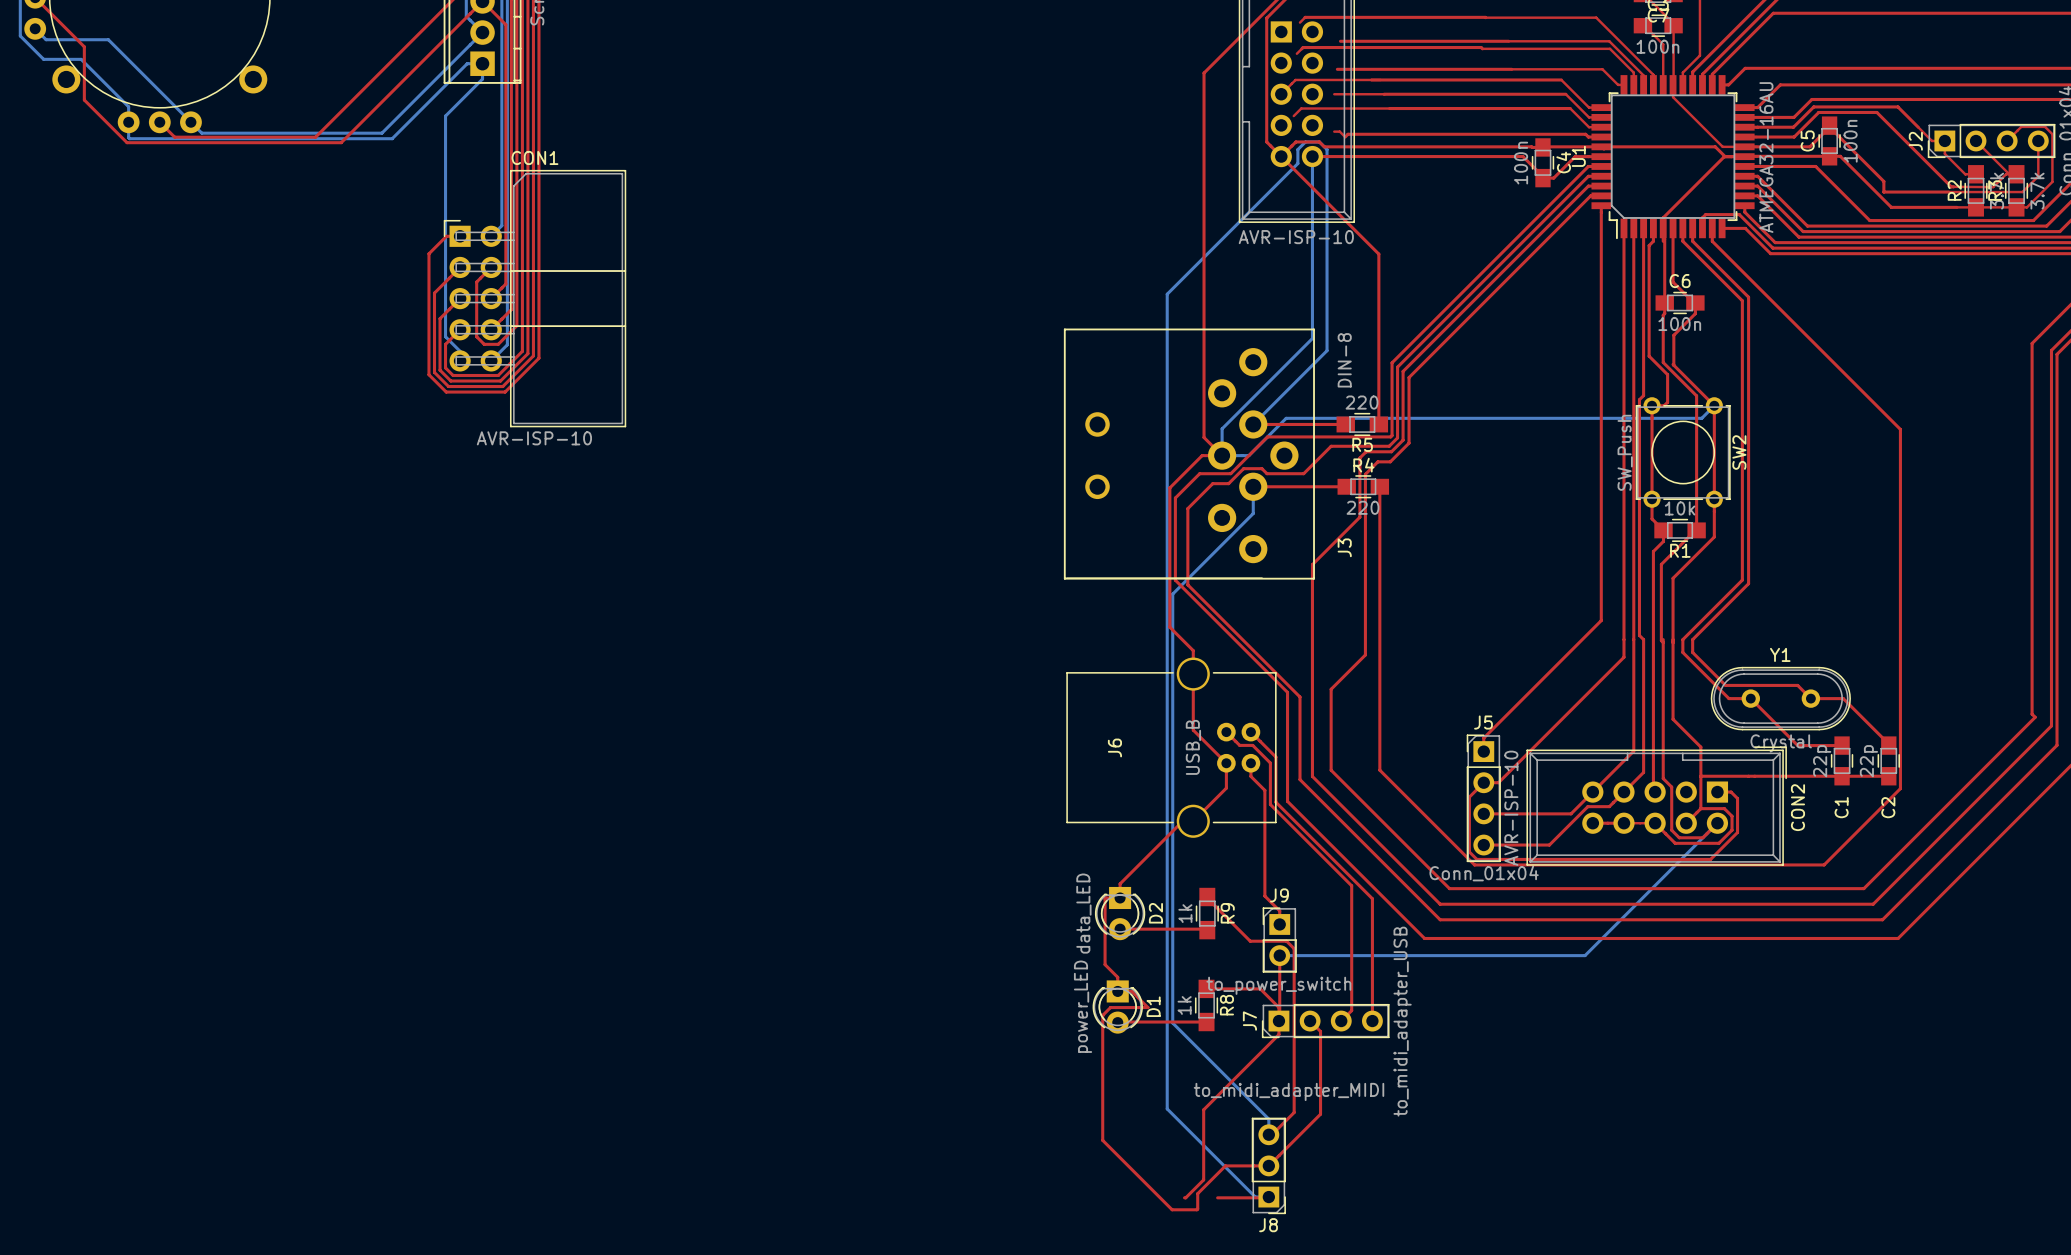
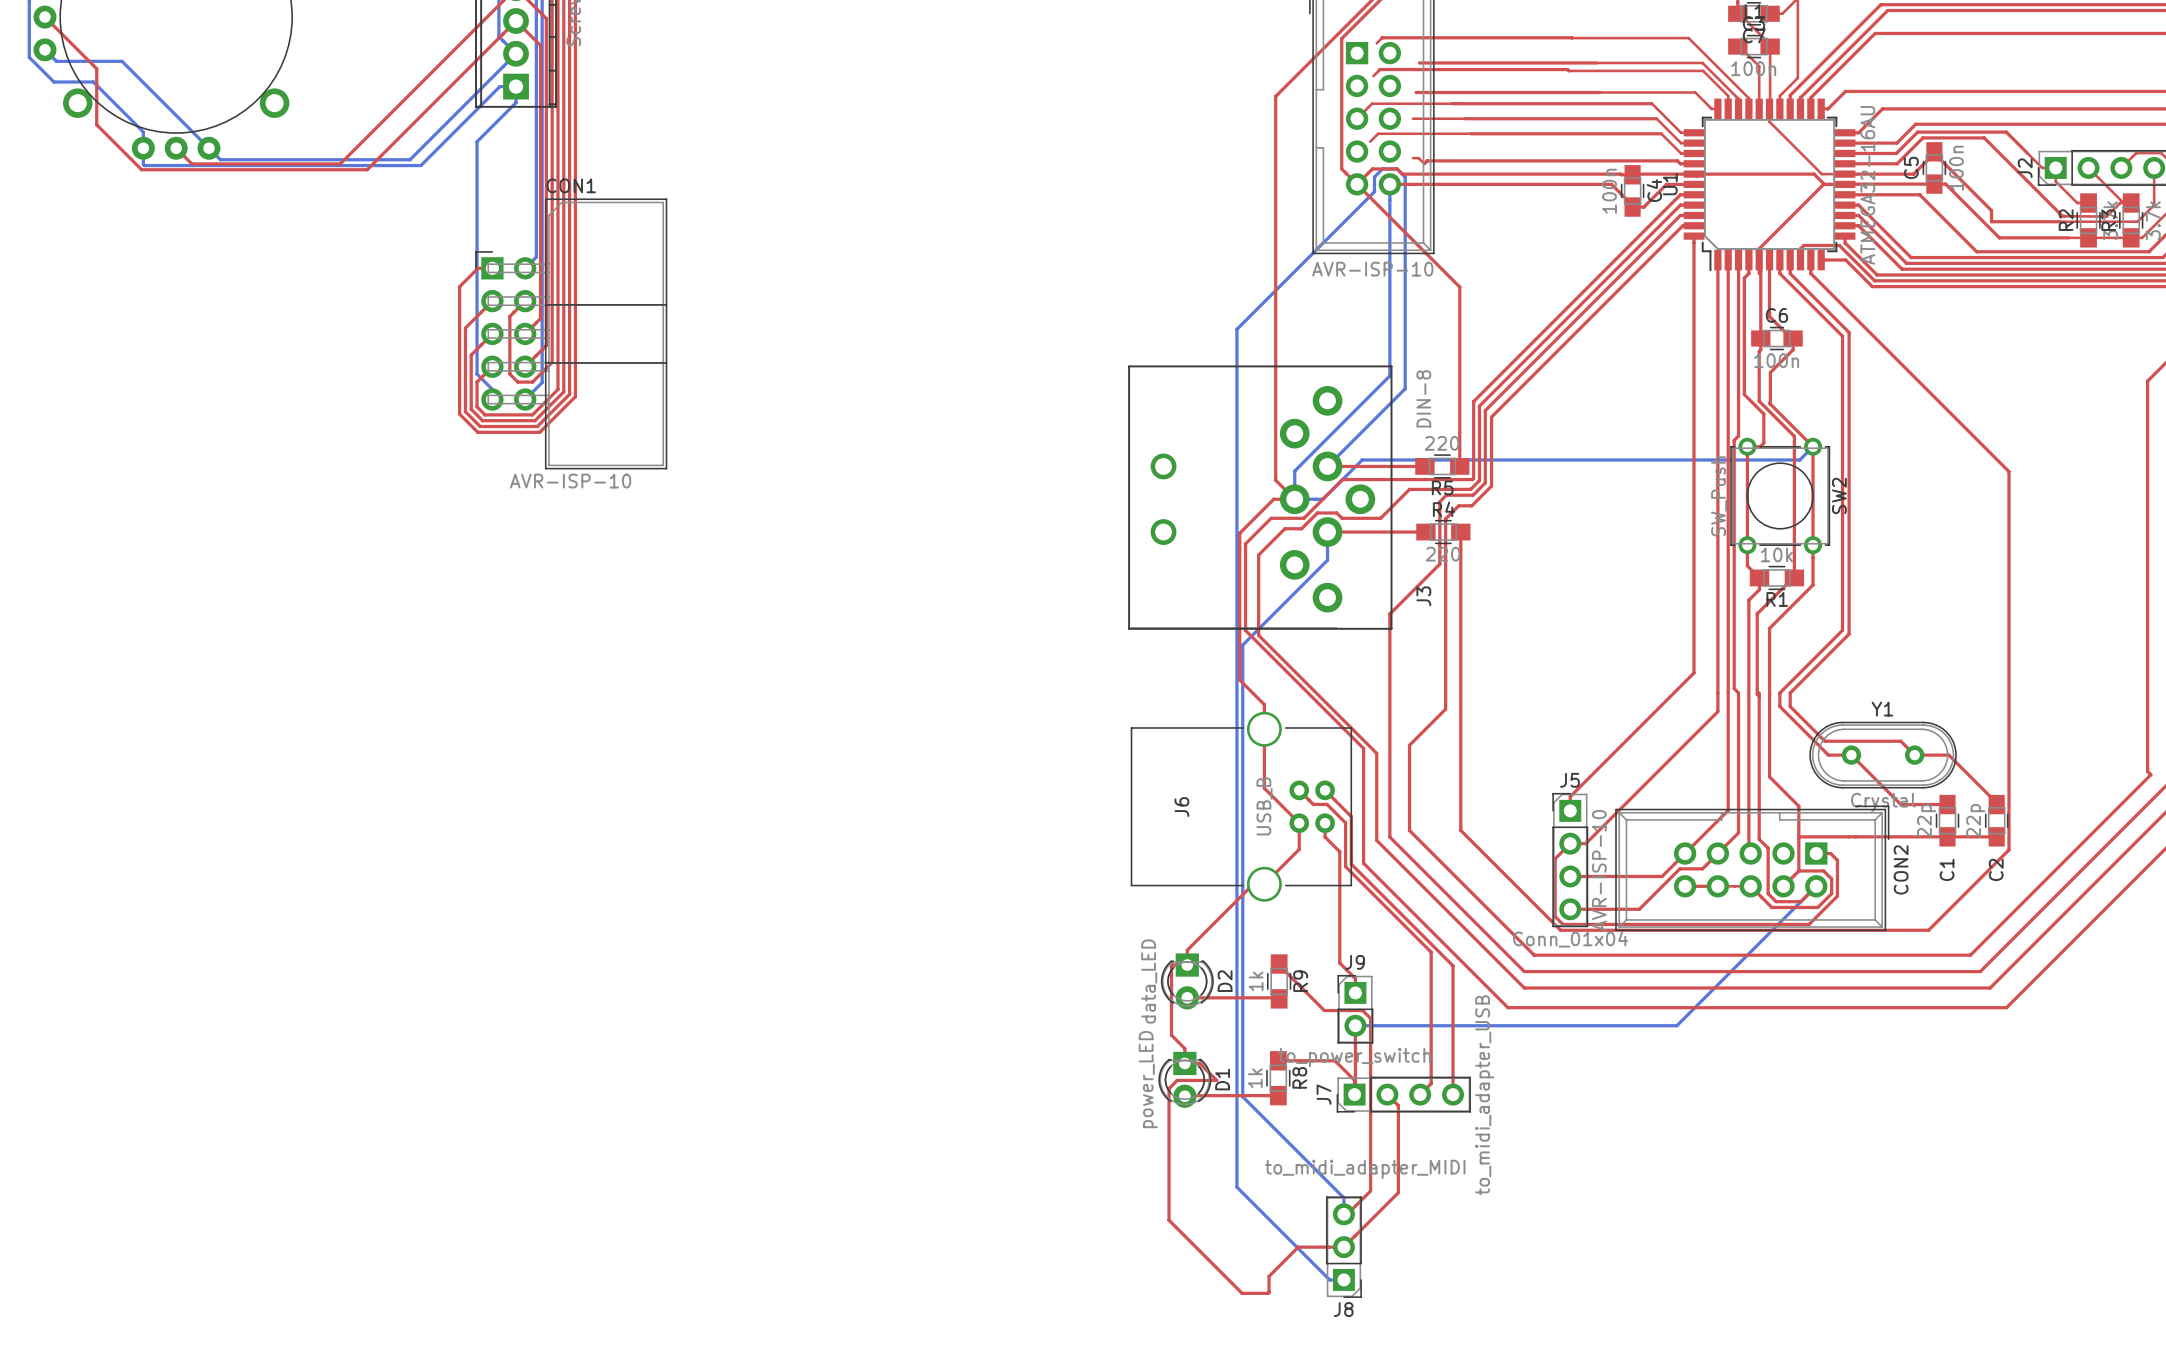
top track: (1278, 1021) (1278, 1034) (1203, 1109) (1203, 1179) (1184, 1197) -> none
top track: (1217, 1197) (1268, 1197) -> none

